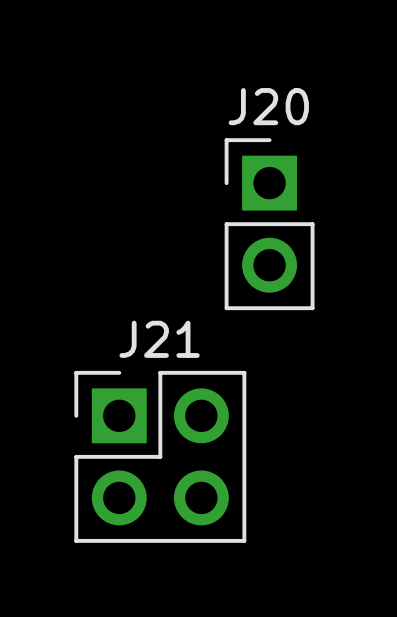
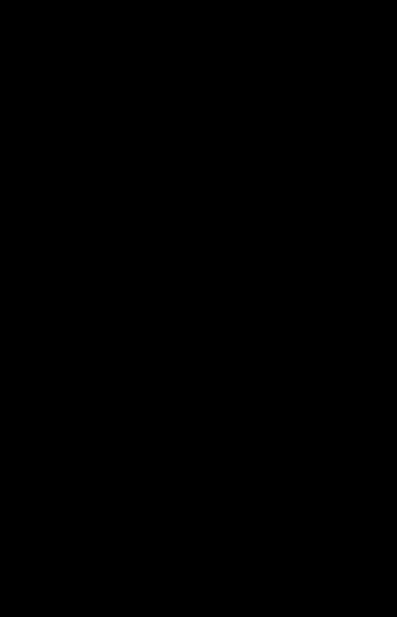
J20: (269, 224) -> none
J21: (160, 456) -> none

